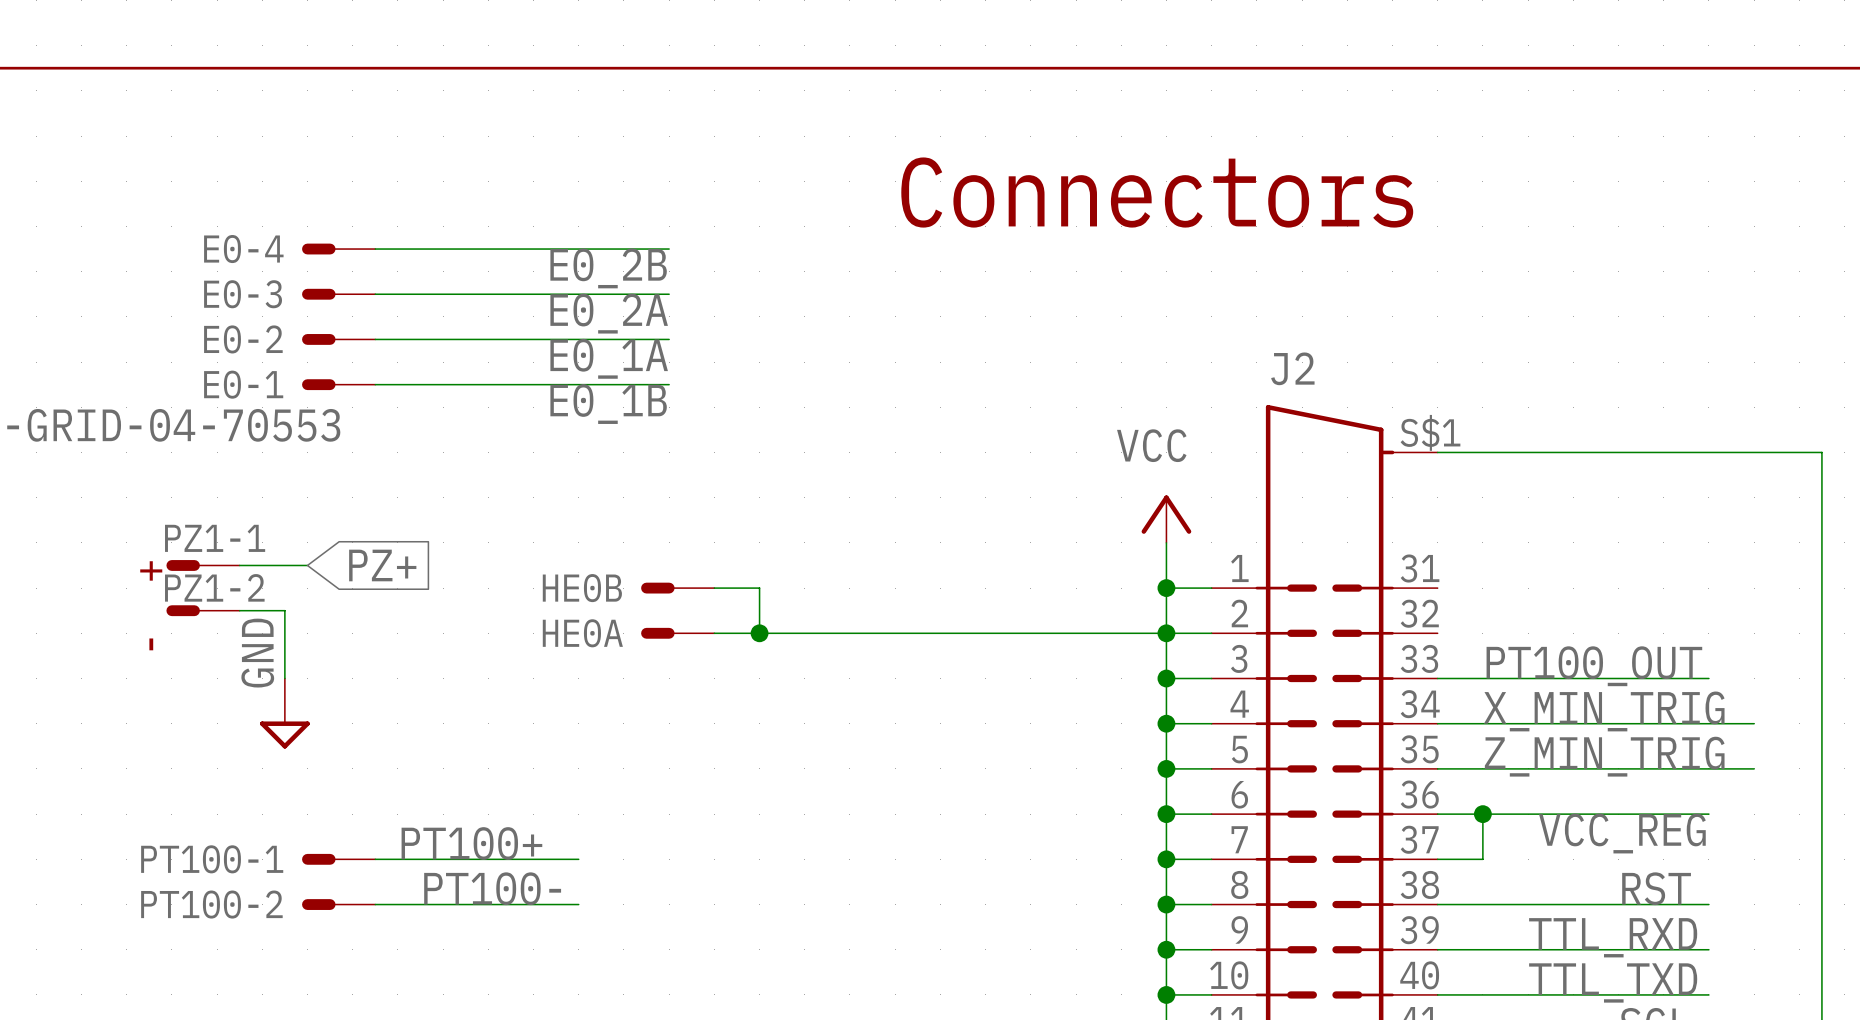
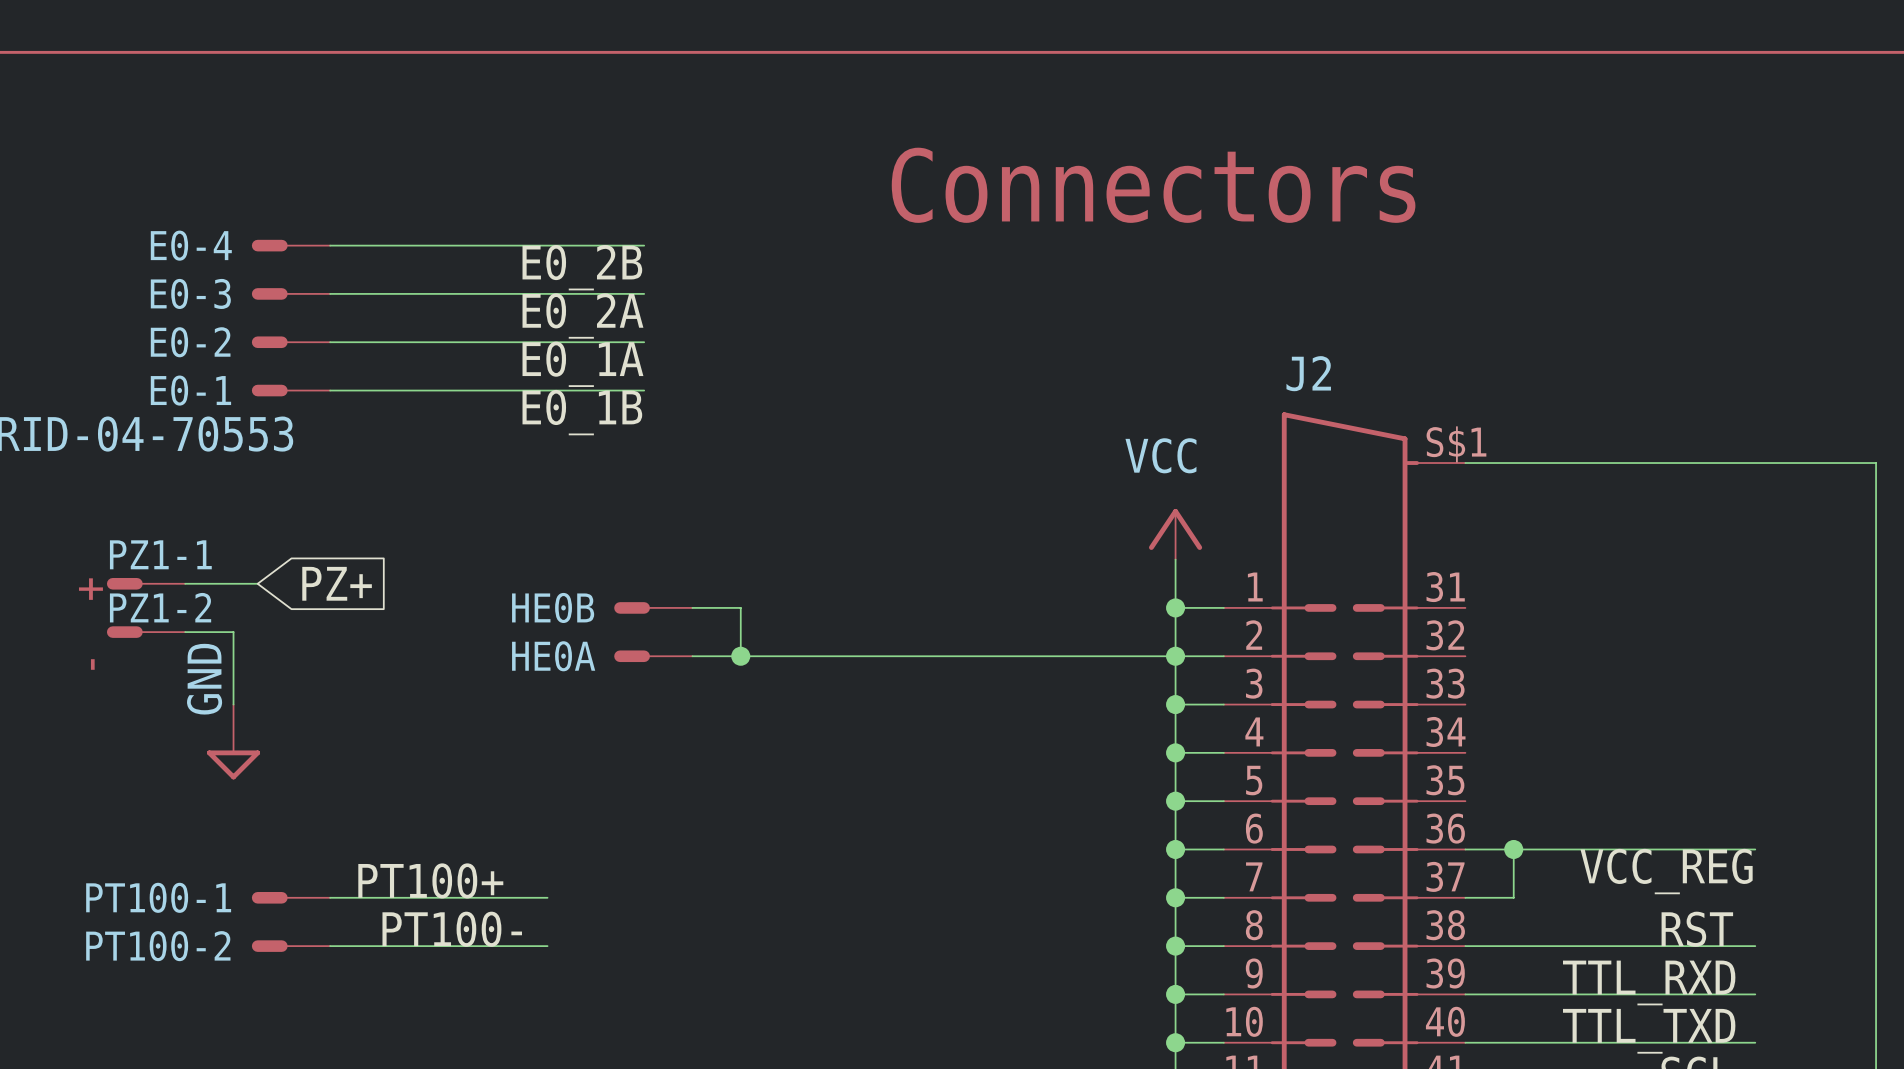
label: PT100_OUT (1594, 666) -> none
wire: (1437, 678) (1708, 678) -> none
label: X_MIN_TRIG (1604, 711) -> none
wire: (1437, 723) (1754, 723) -> none
label: Z_MIN_TRIG (1604, 756) -> none
wire: (1437, 768) (1754, 768) -> none

